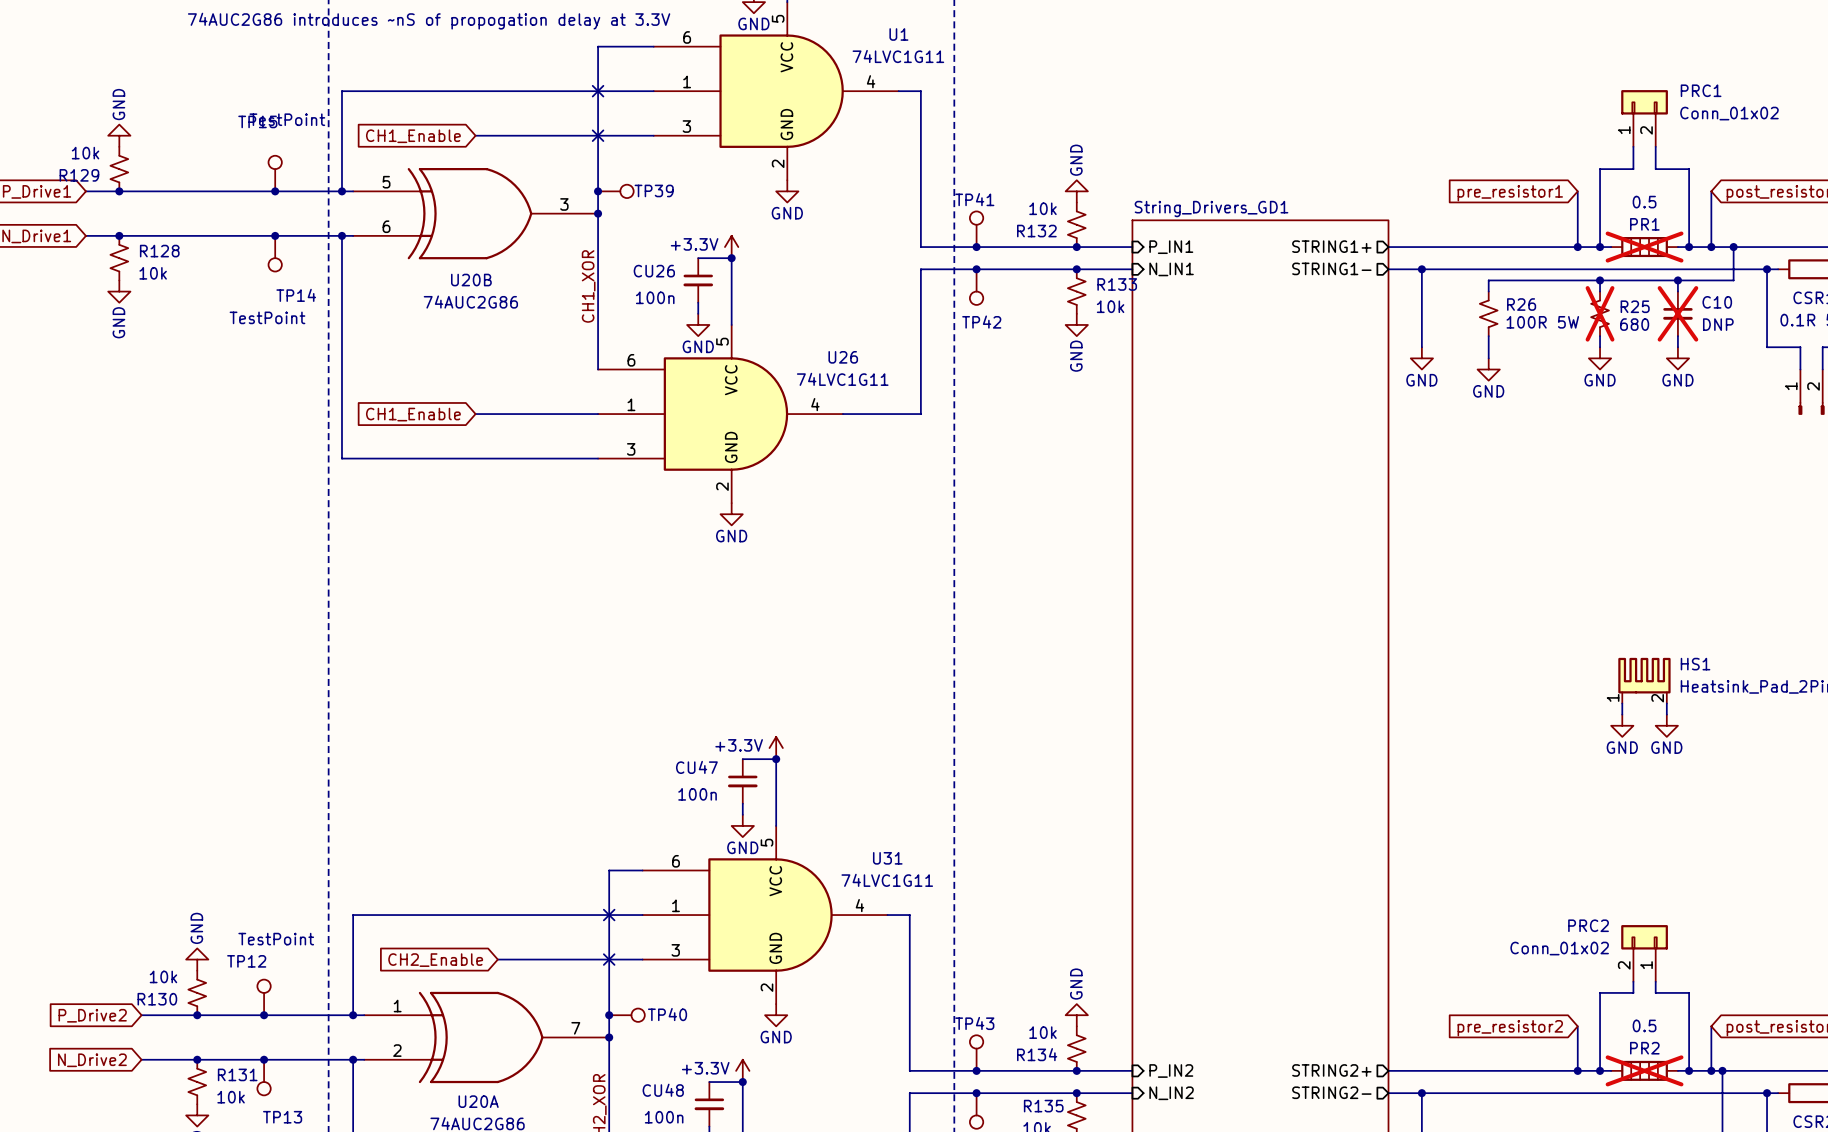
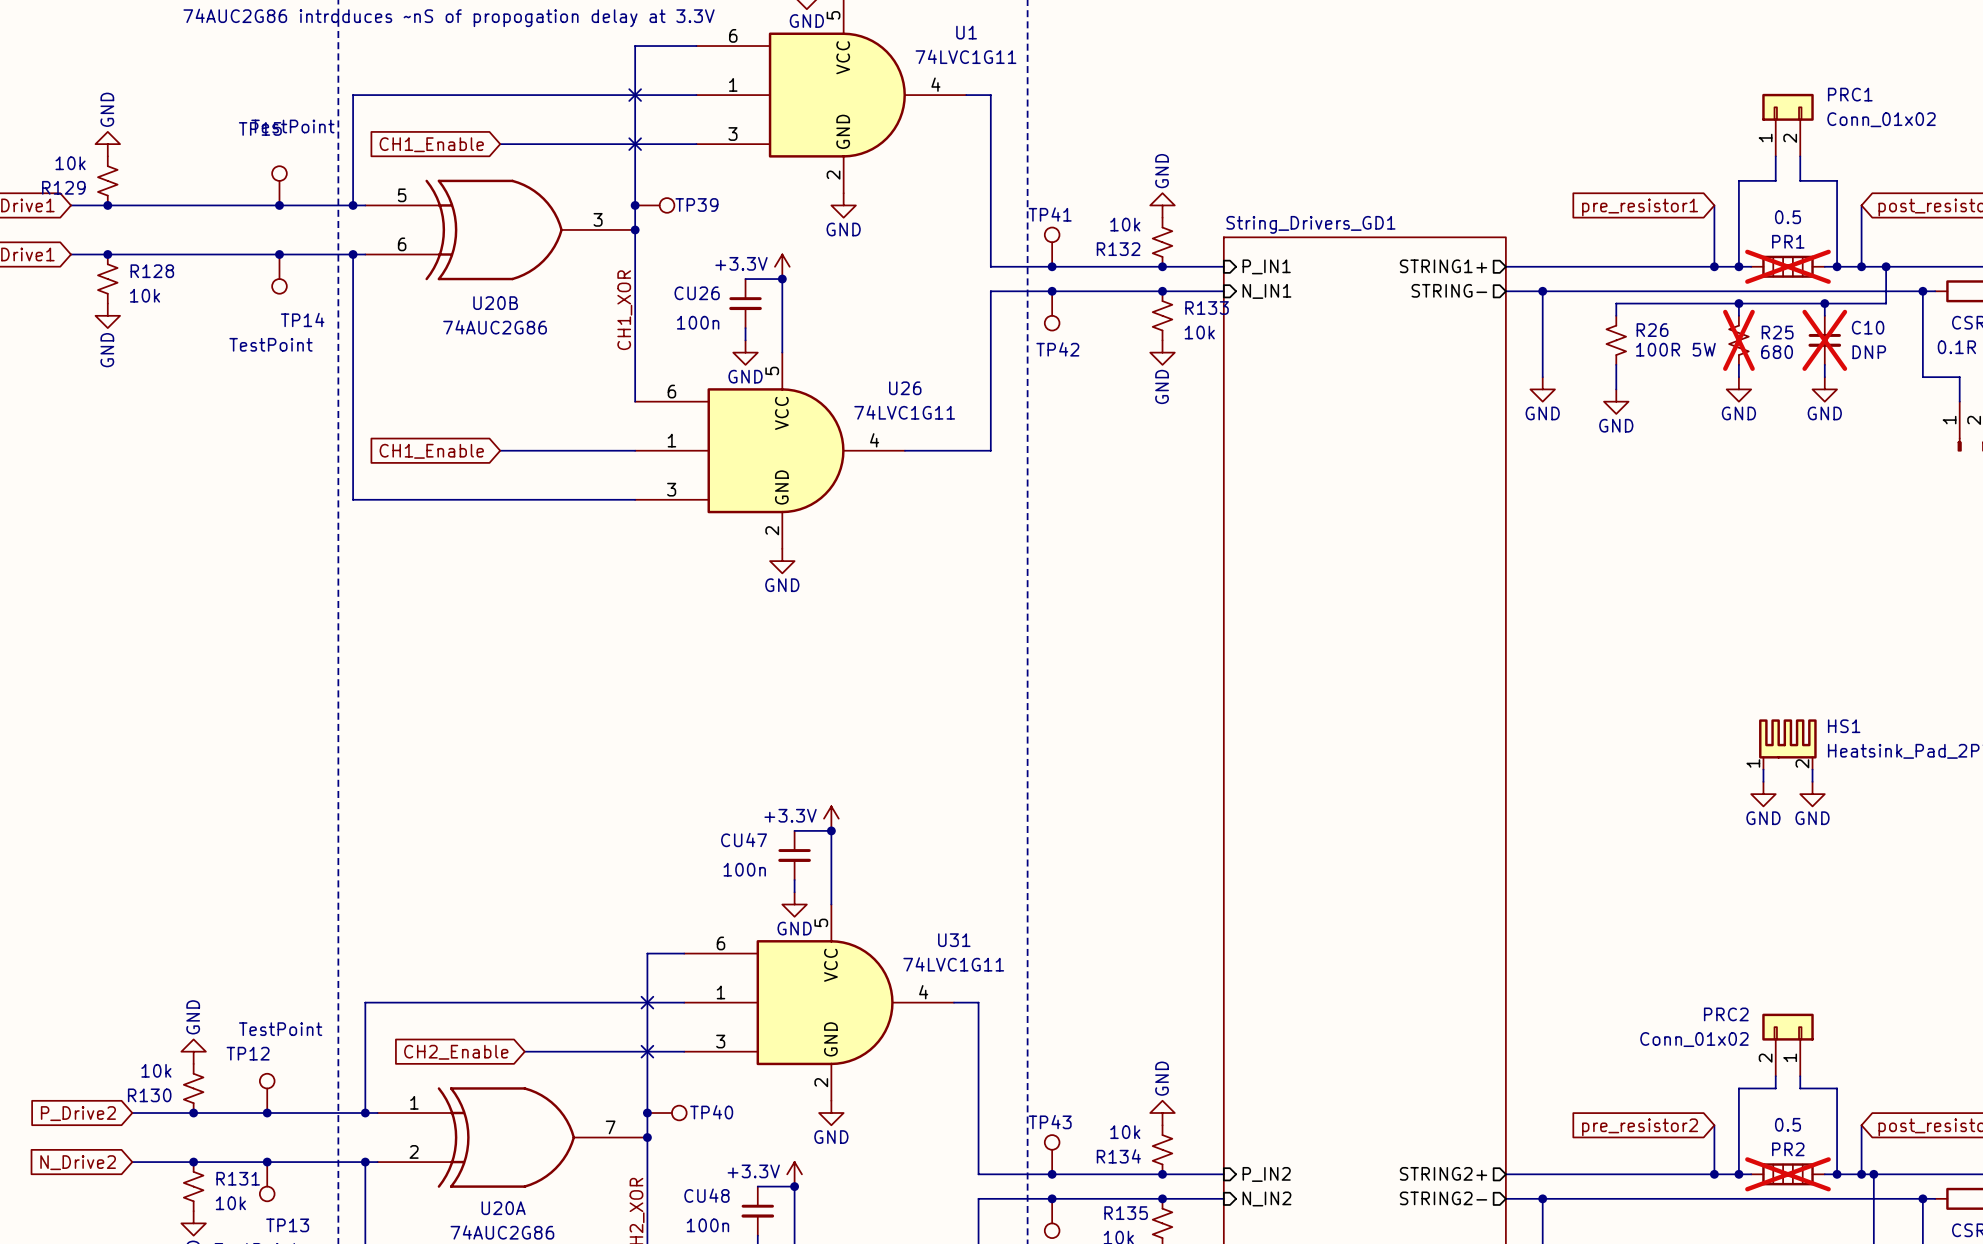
sheet pin: STRING1- (1331, 268) -> STRING- (1449, 290)

